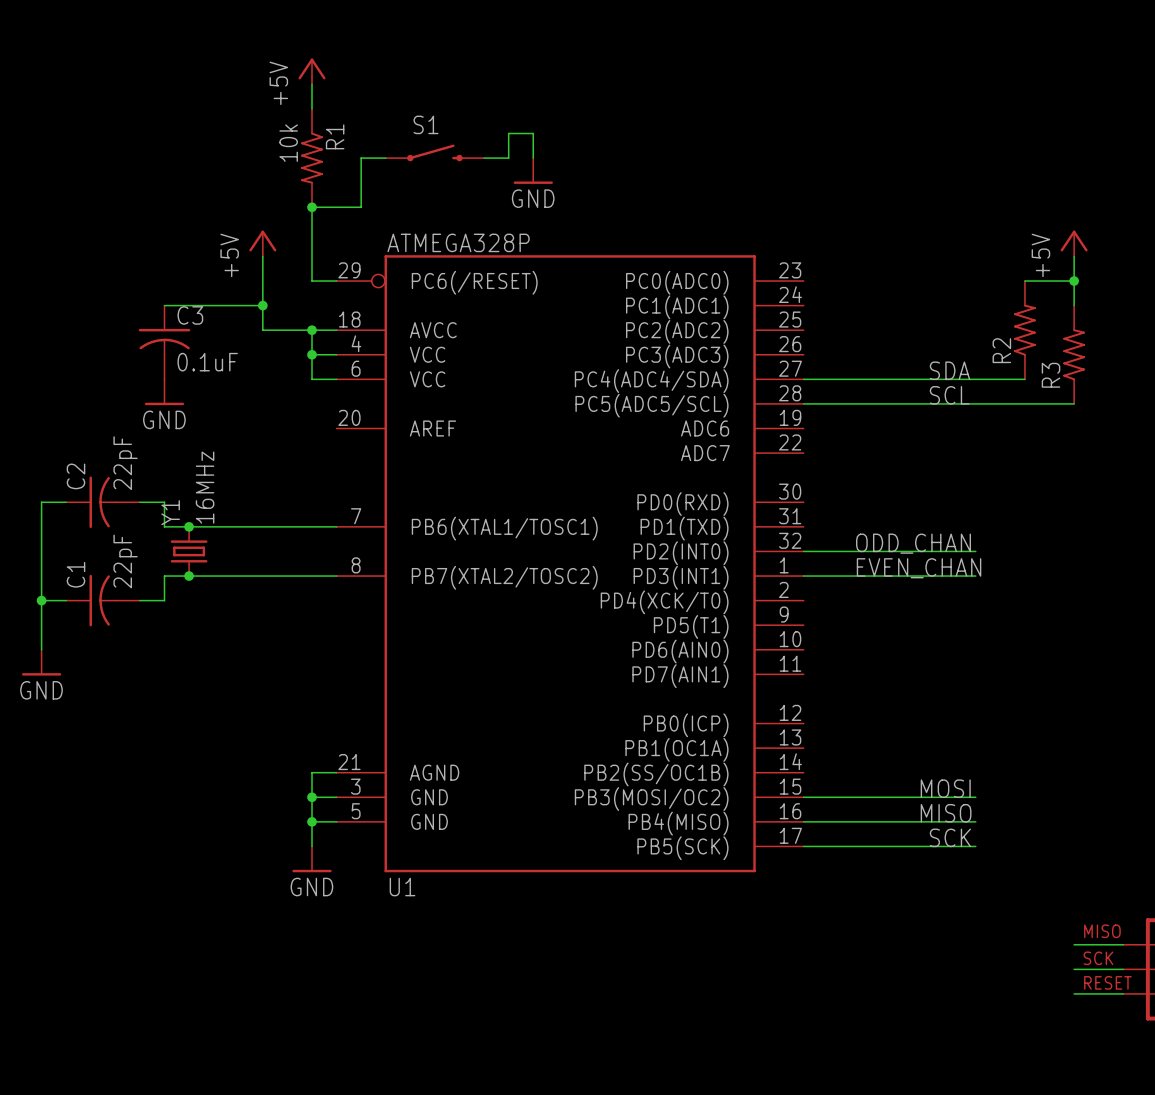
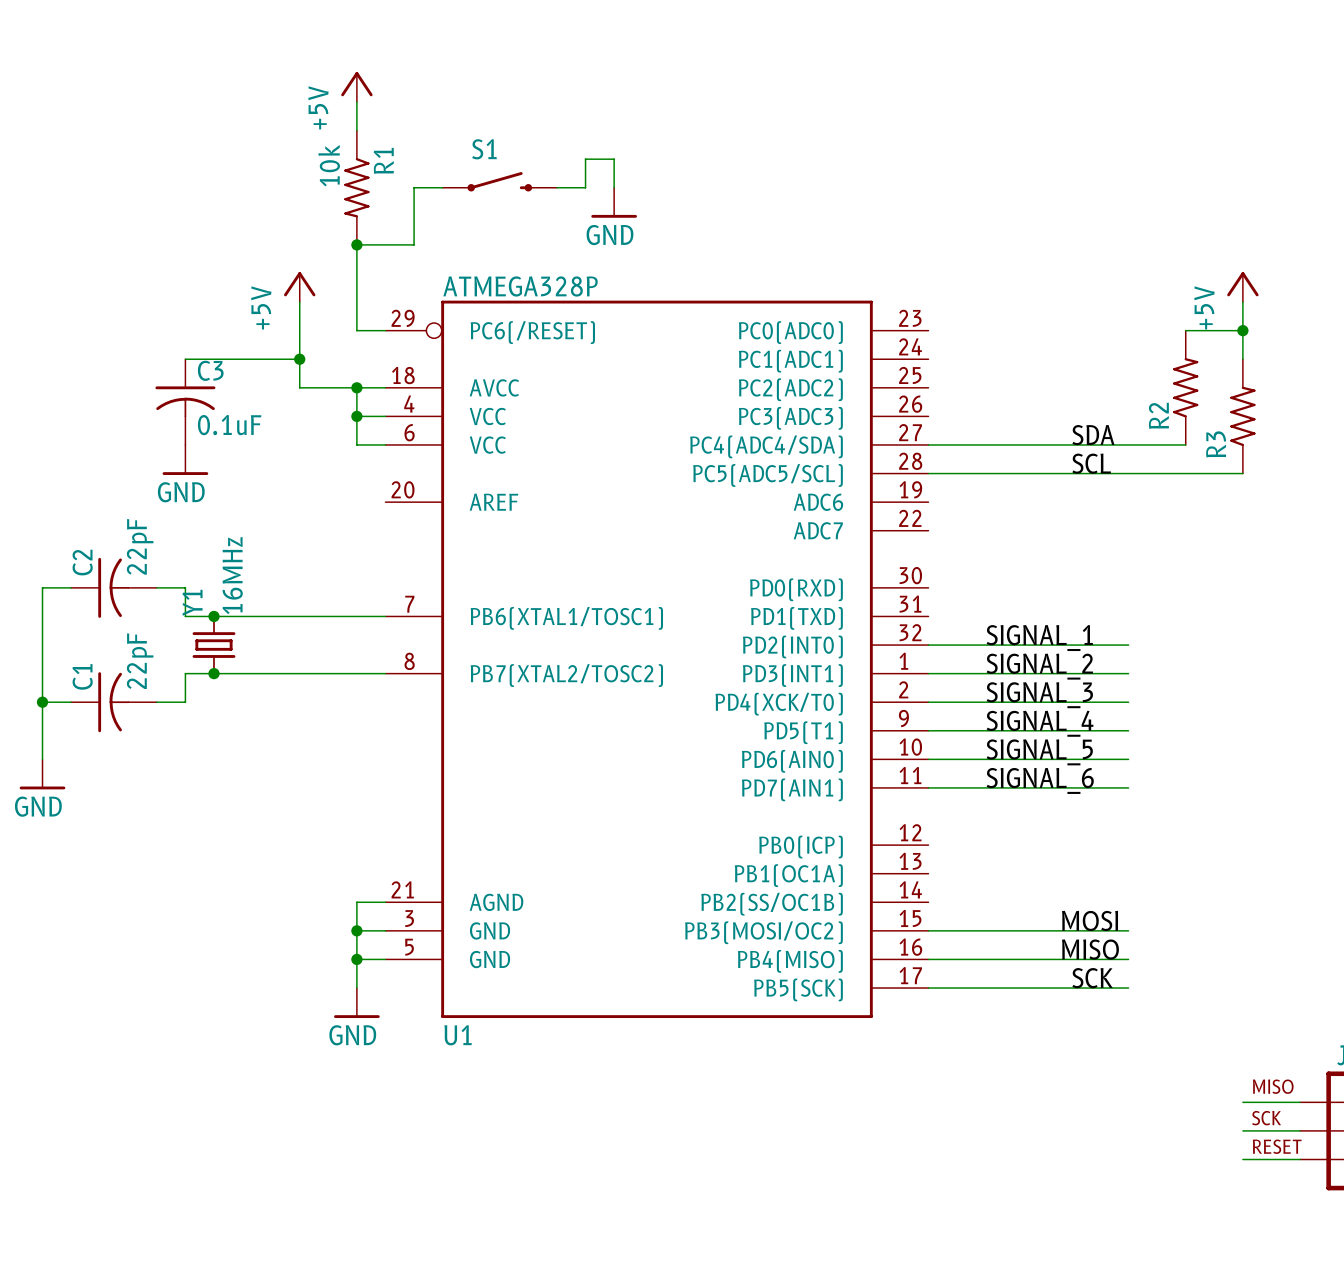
label: ODD_CHAN (913, 543) -> SIGNAL_1 (1039, 638)
label: EVEN_CHAN (919, 568) -> SIGNAL_2 (1039, 666)
label: none -> SIGNAL_3 (1039, 695)
wire: none -> (928, 702) (1128, 702)
label: none -> SIGNAL_4 (1040, 723)
wire: none -> (928, 730) (1128, 730)
label: none -> SIGNAL_5 (1039, 752)
wire: none -> (928, 759) (1128, 759)
label: none -> SIGNAL_6 (1040, 780)
wire: none -> (928, 787) (1128, 787)

